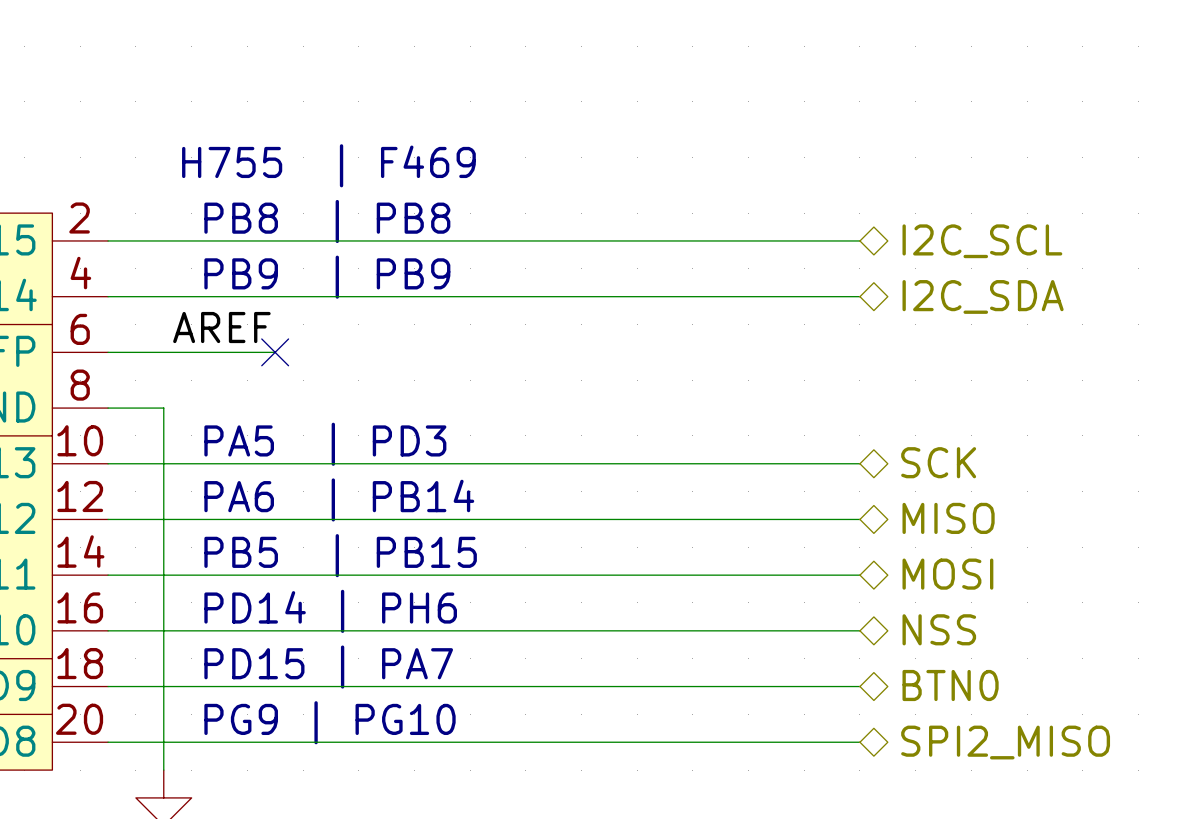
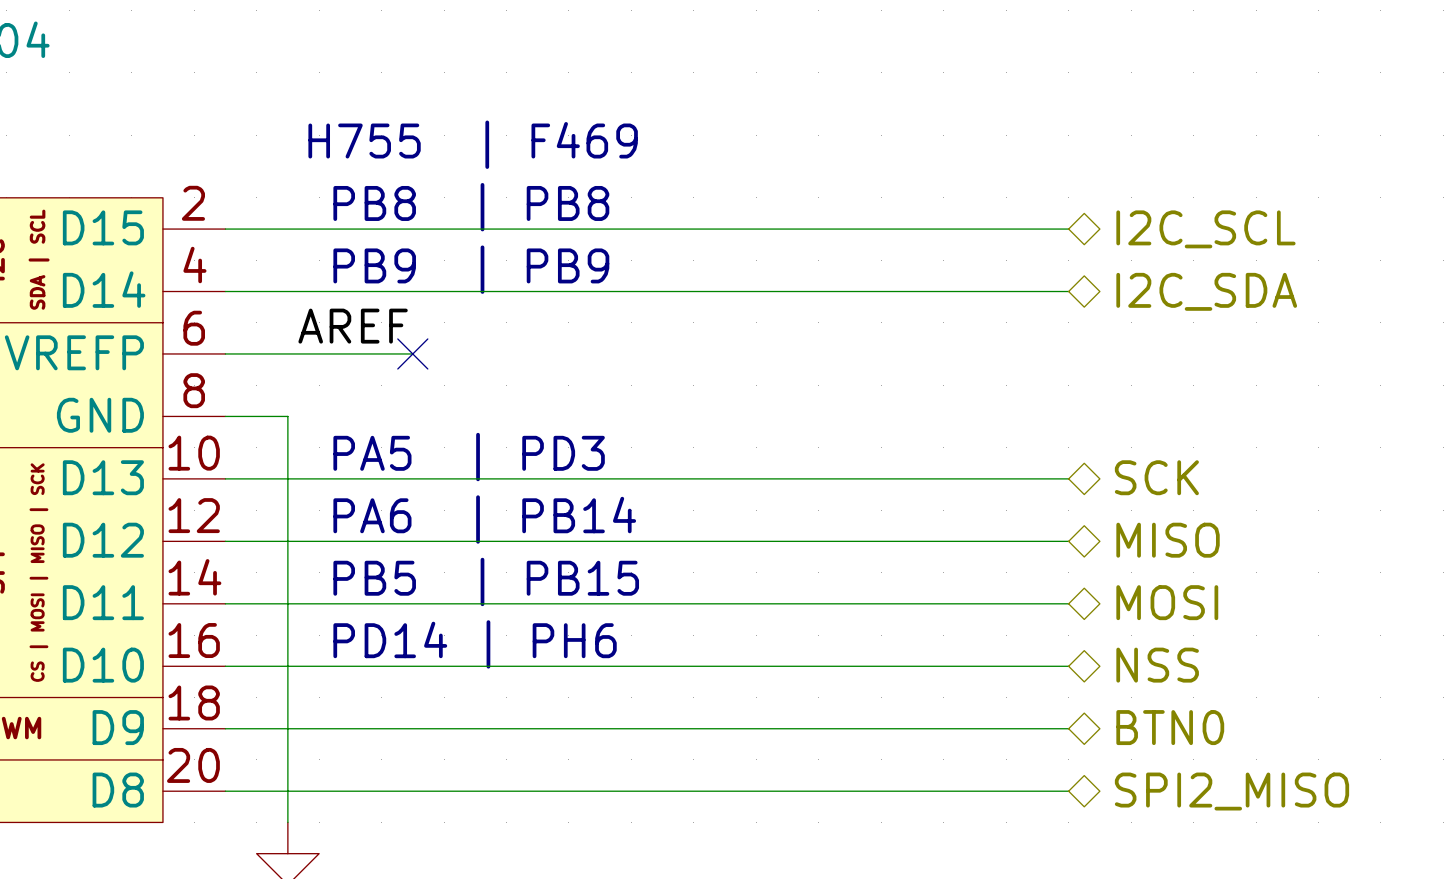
text: PD15 | PA7 (328, 667) -> none
text: PG9 | PG10 (330, 722) -> none

